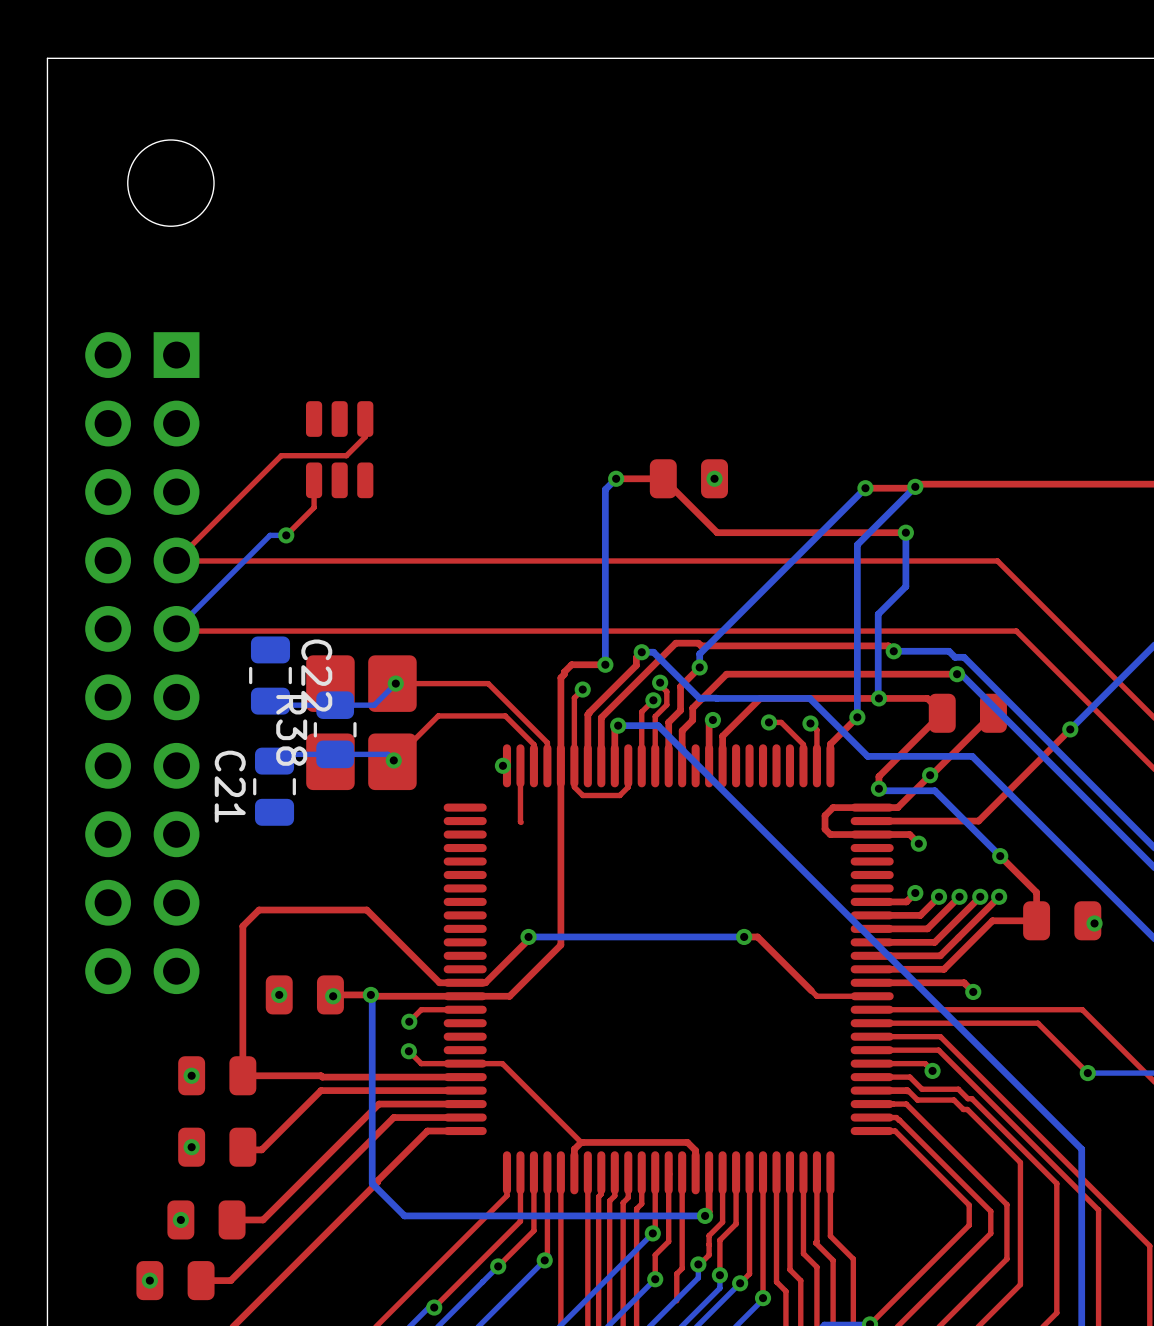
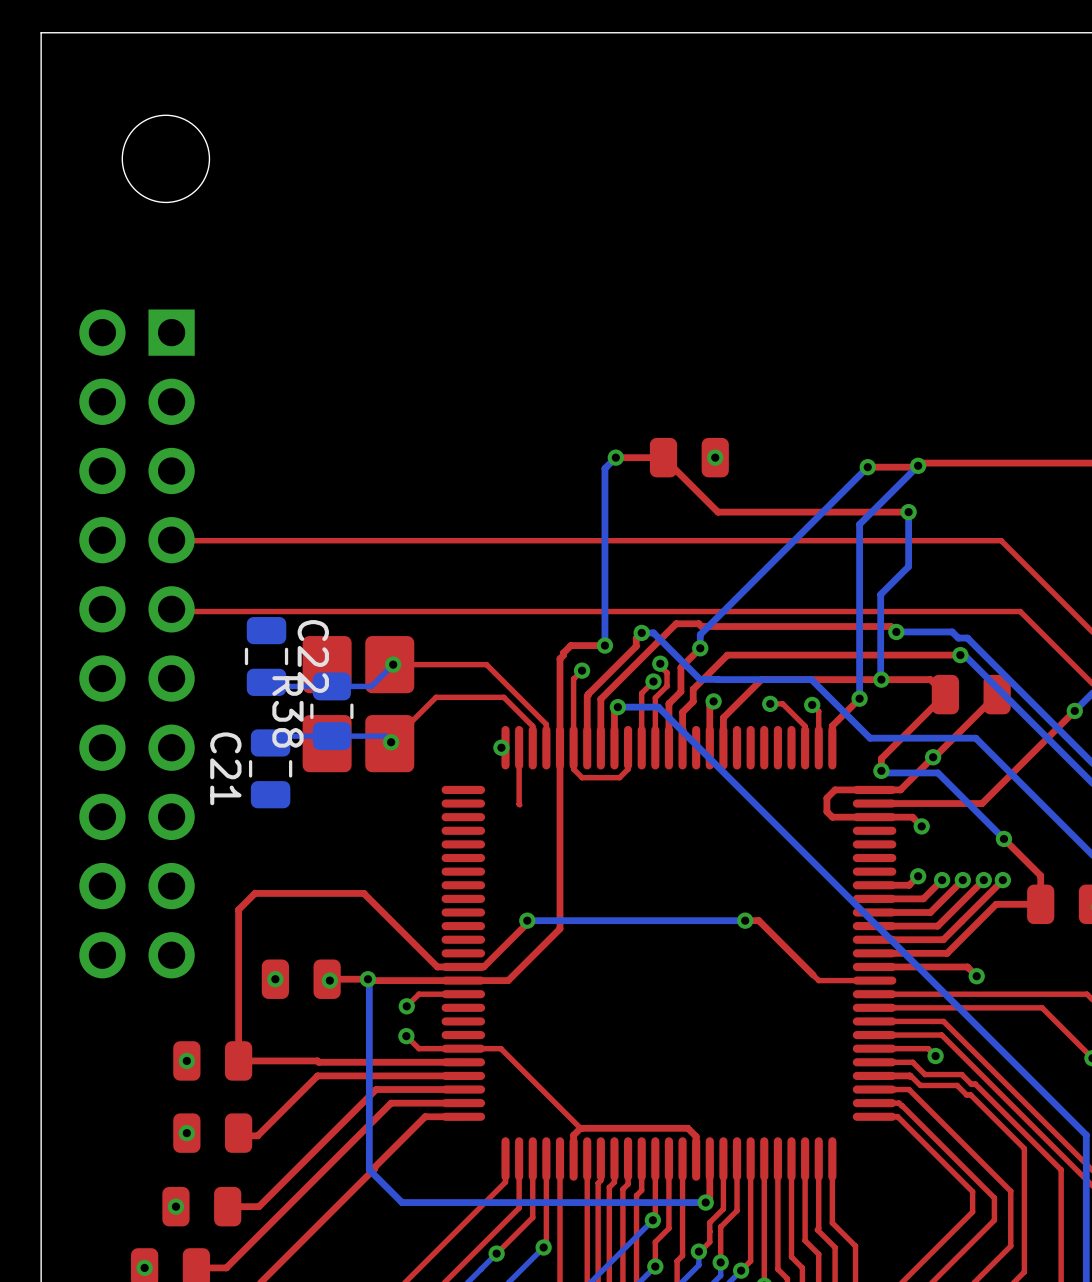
top track: (365, 419) (365, 436) (346, 455) (281, 455) (176, 560) -> none
part: (339, 449) -> none
top track: (314, 480) (314, 507) (284, 537) -> none
bottom track: (286, 535) (270, 535) (176, 628) -> none
via: (286, 535) -> none

